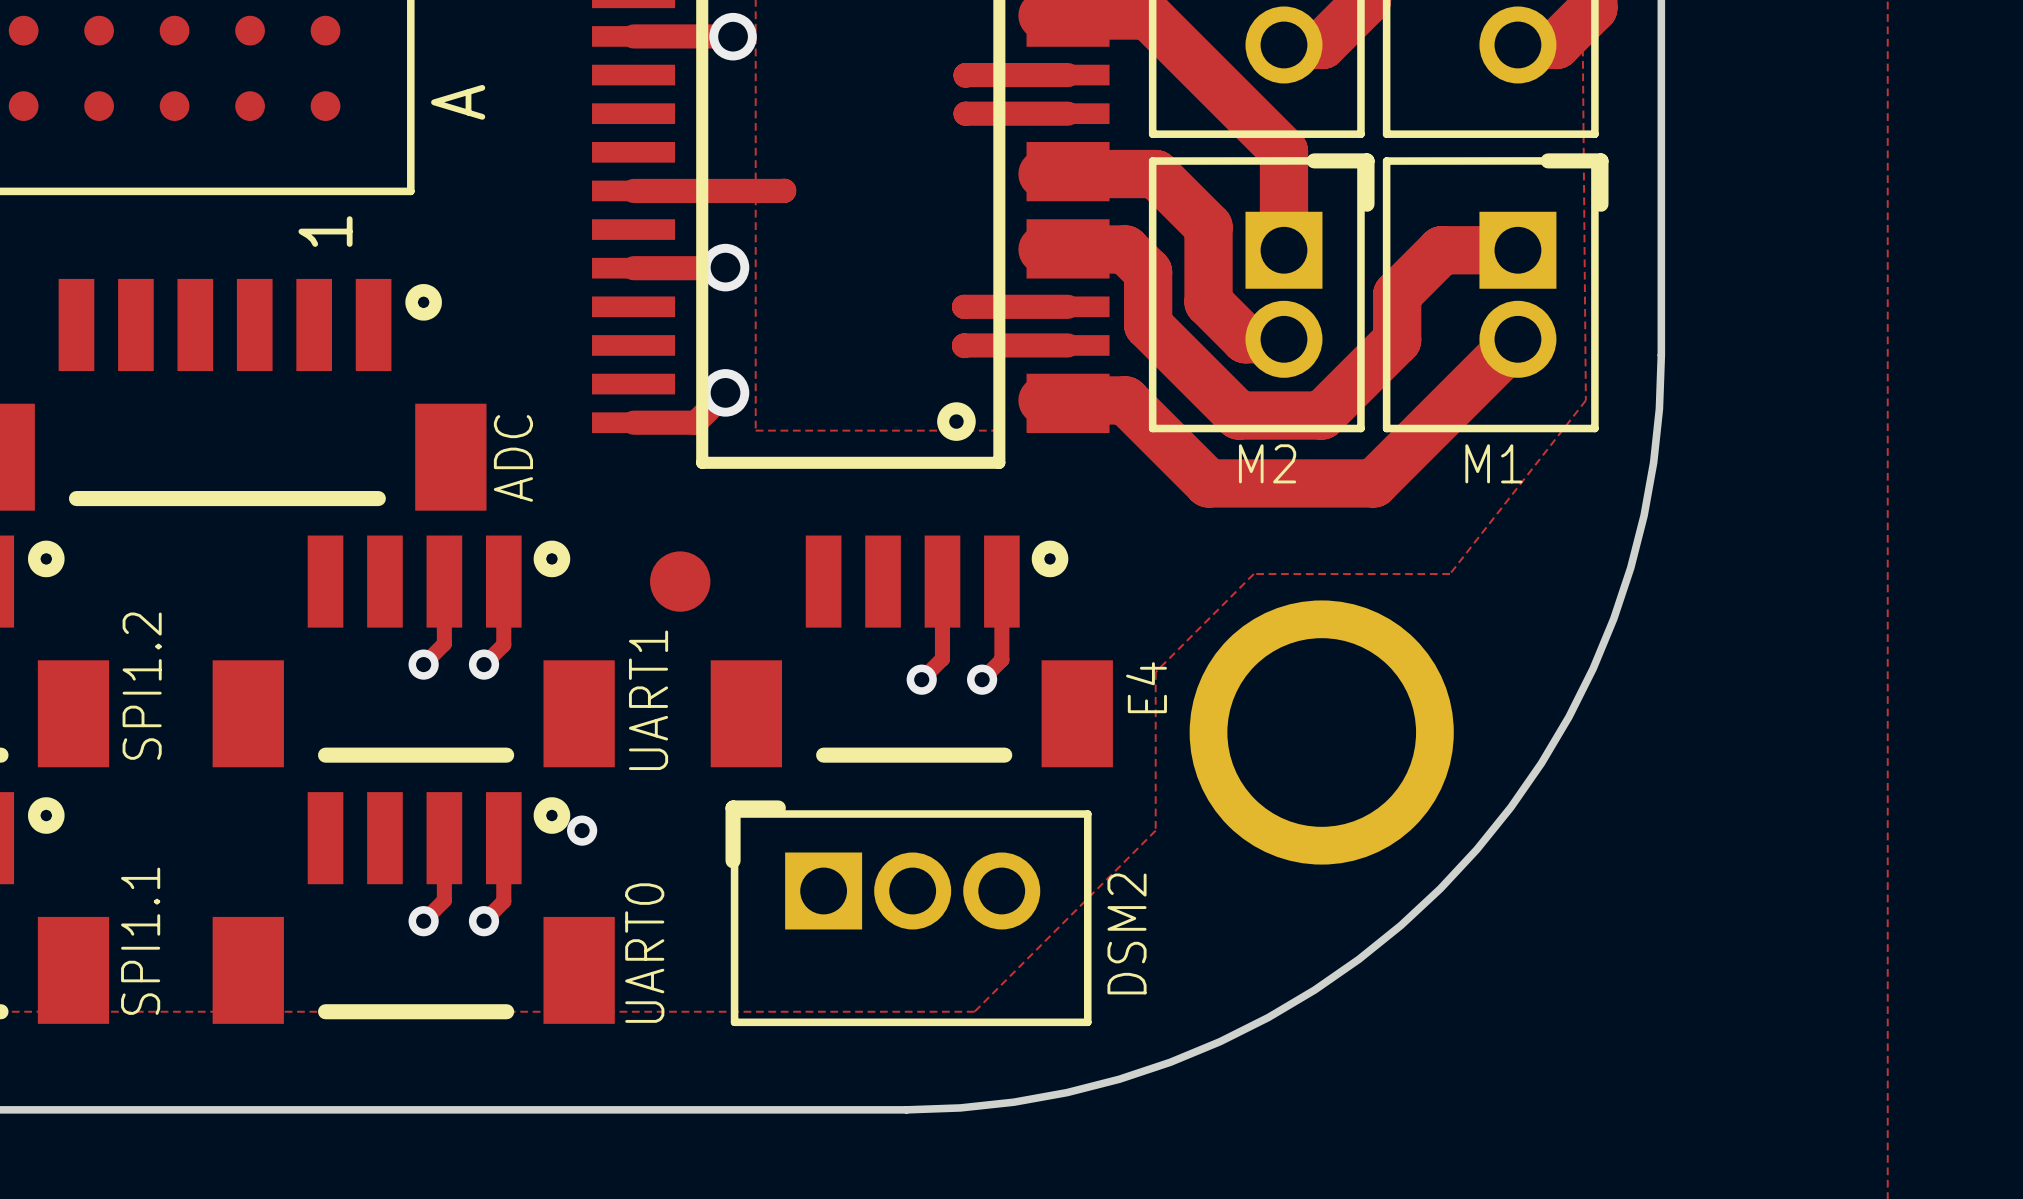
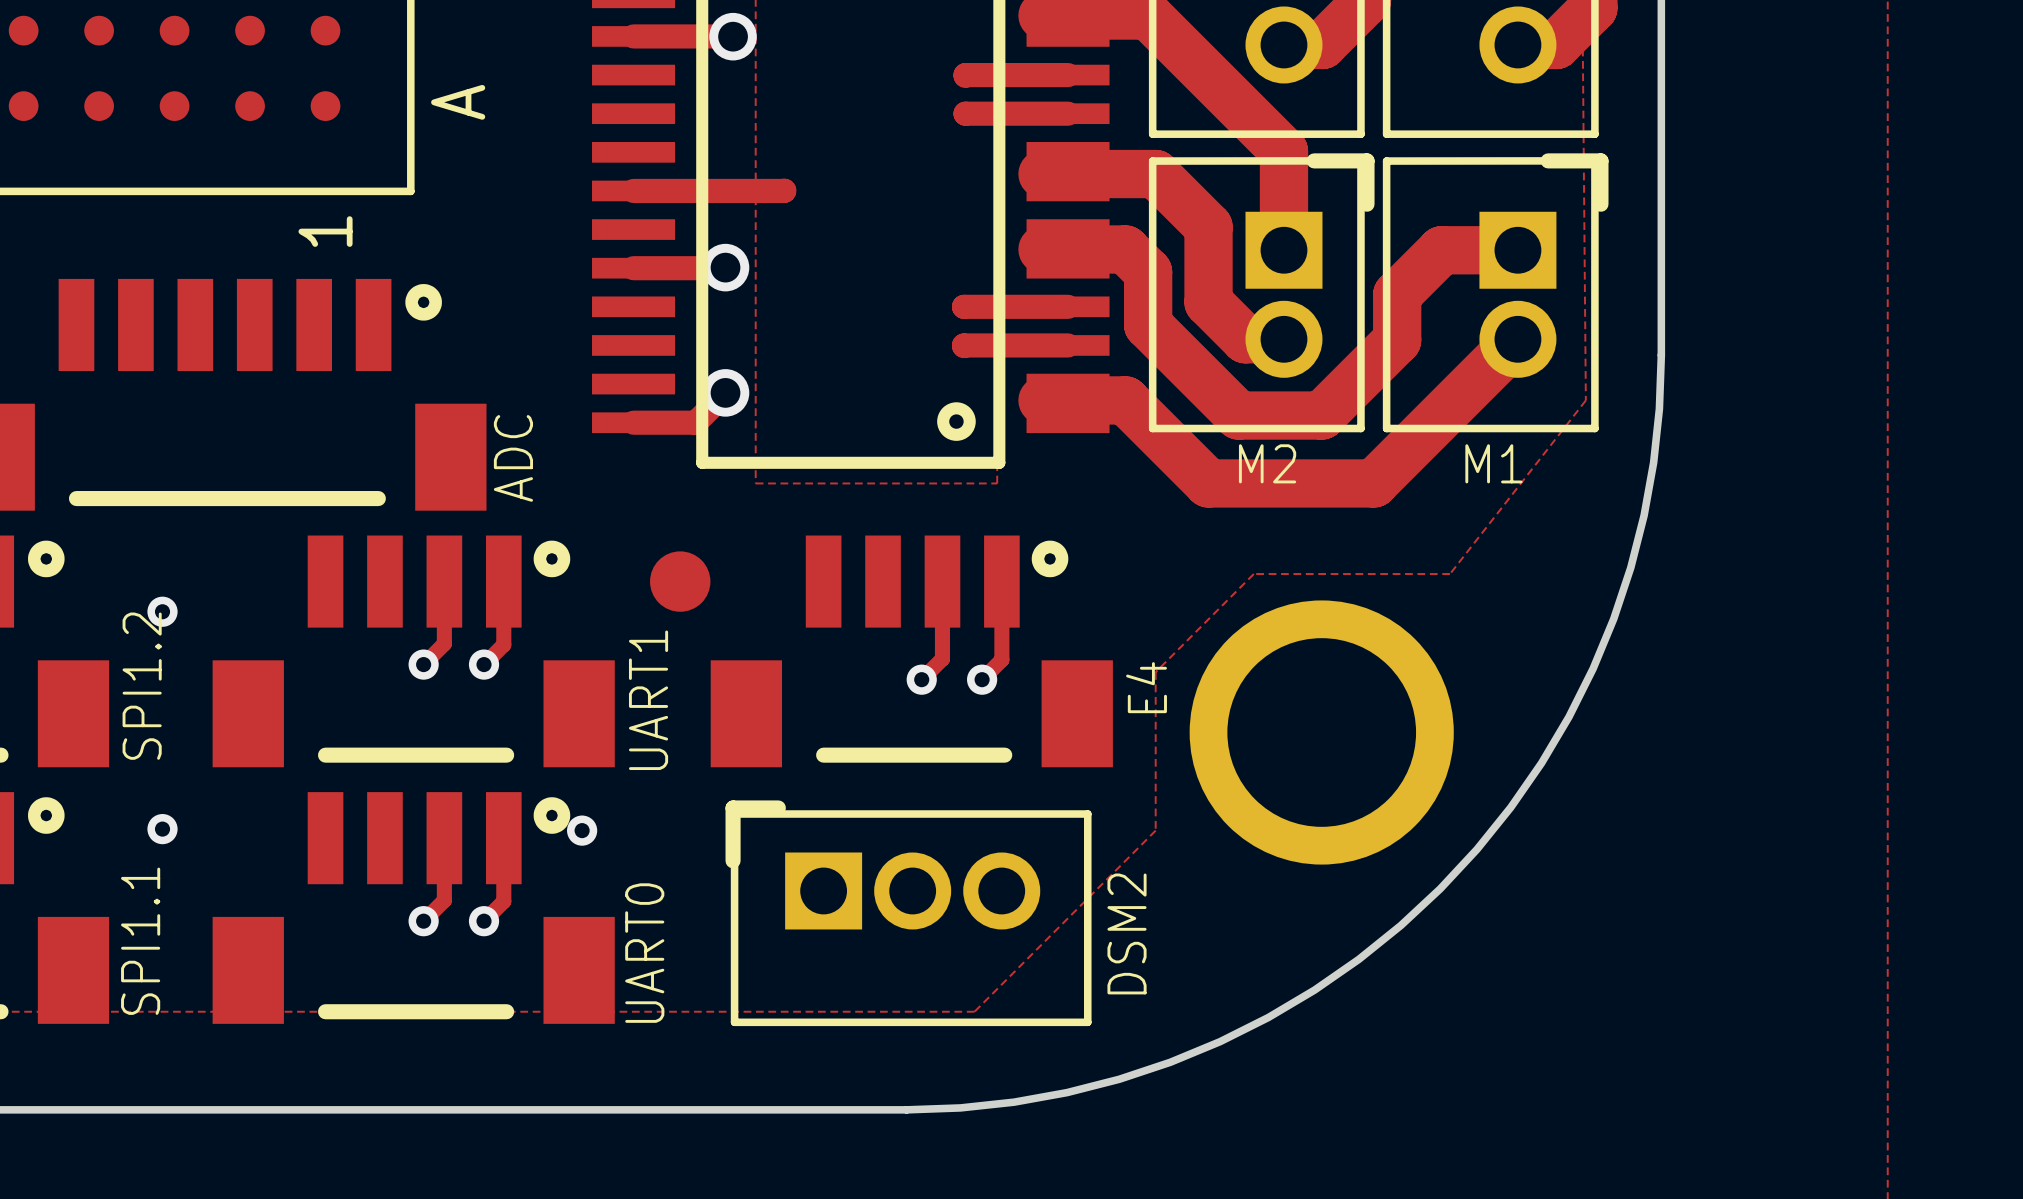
zone outline: (755, 430) (997, 430) -> (755, 430) (755, 483) (997, 483) (997, 430)
via: none -> (162, 611)
via: none -> (162, 829)

